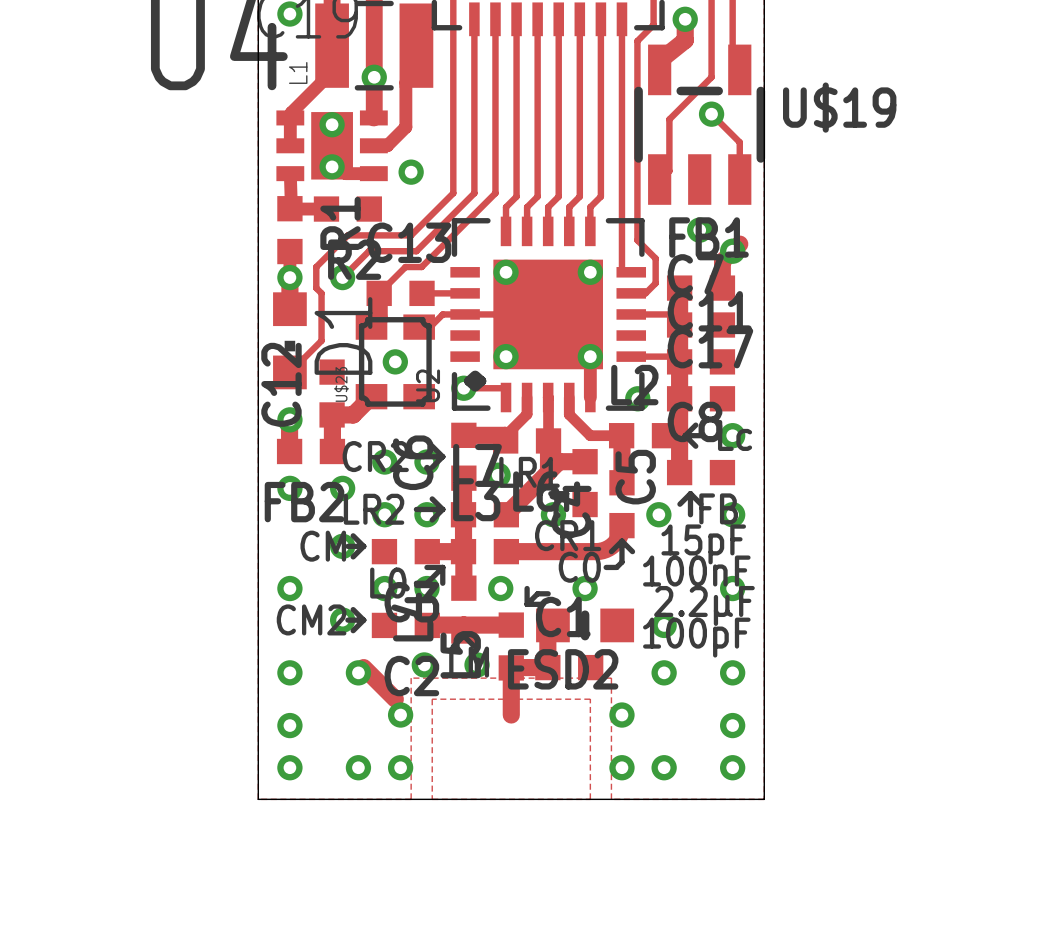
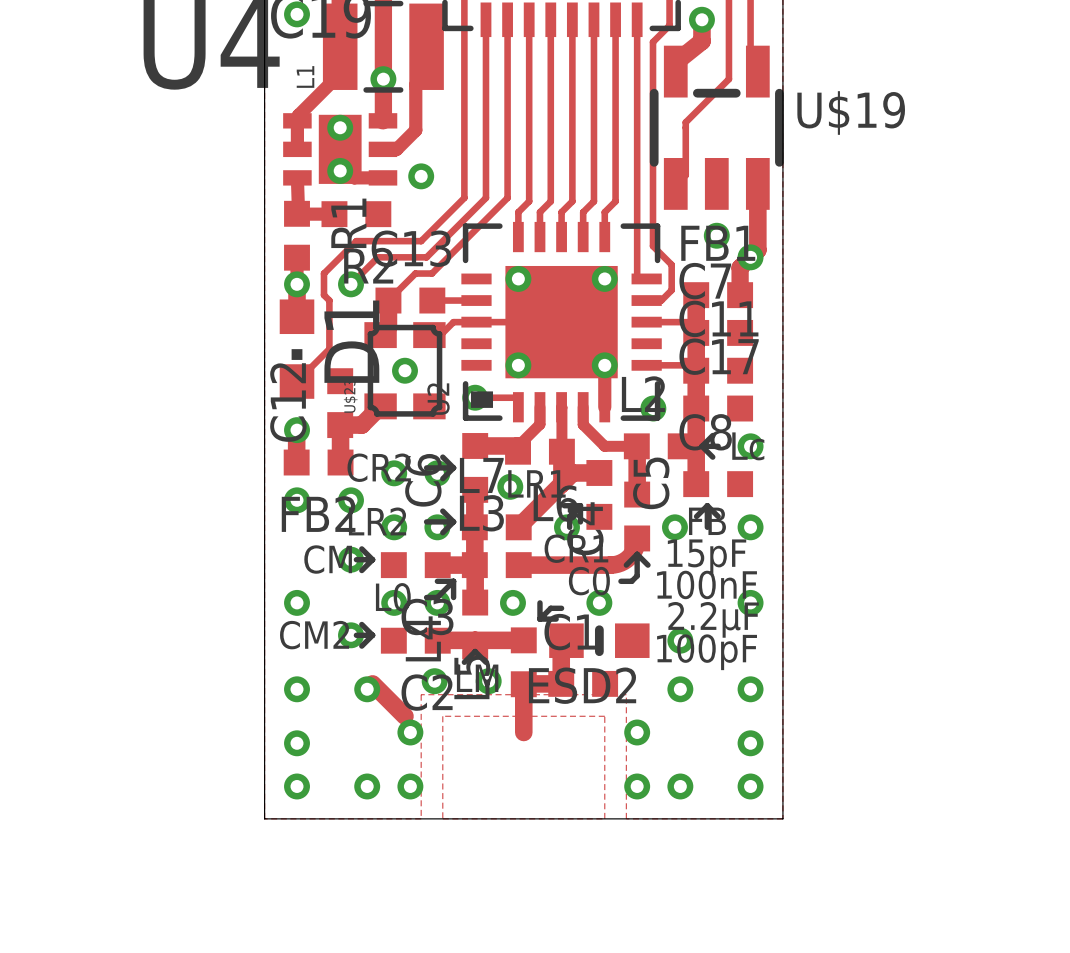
track: (711, 114) (739, 142) (739, 179) -> (757, 250) (757, 183)
via: (711, 114) -> none

